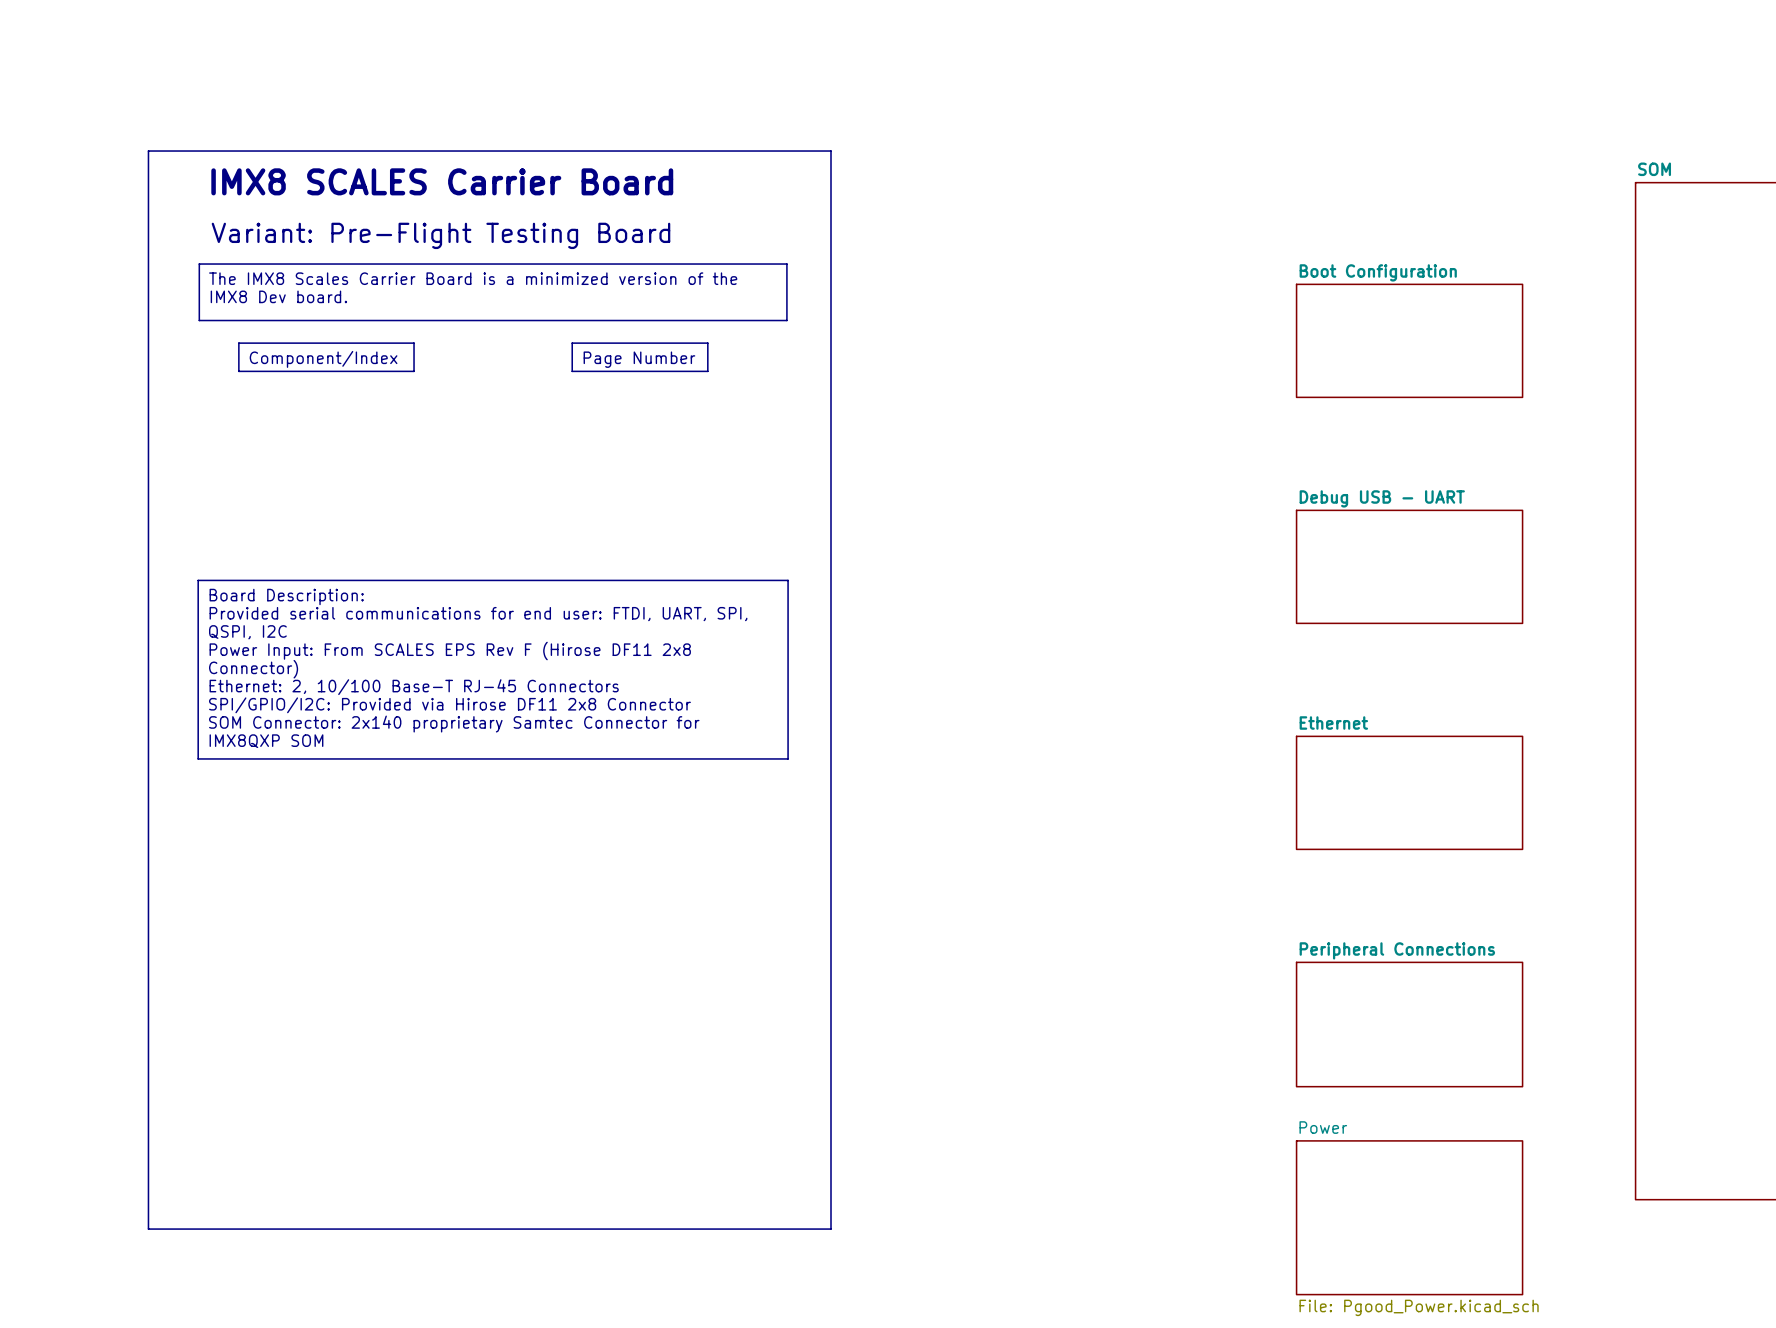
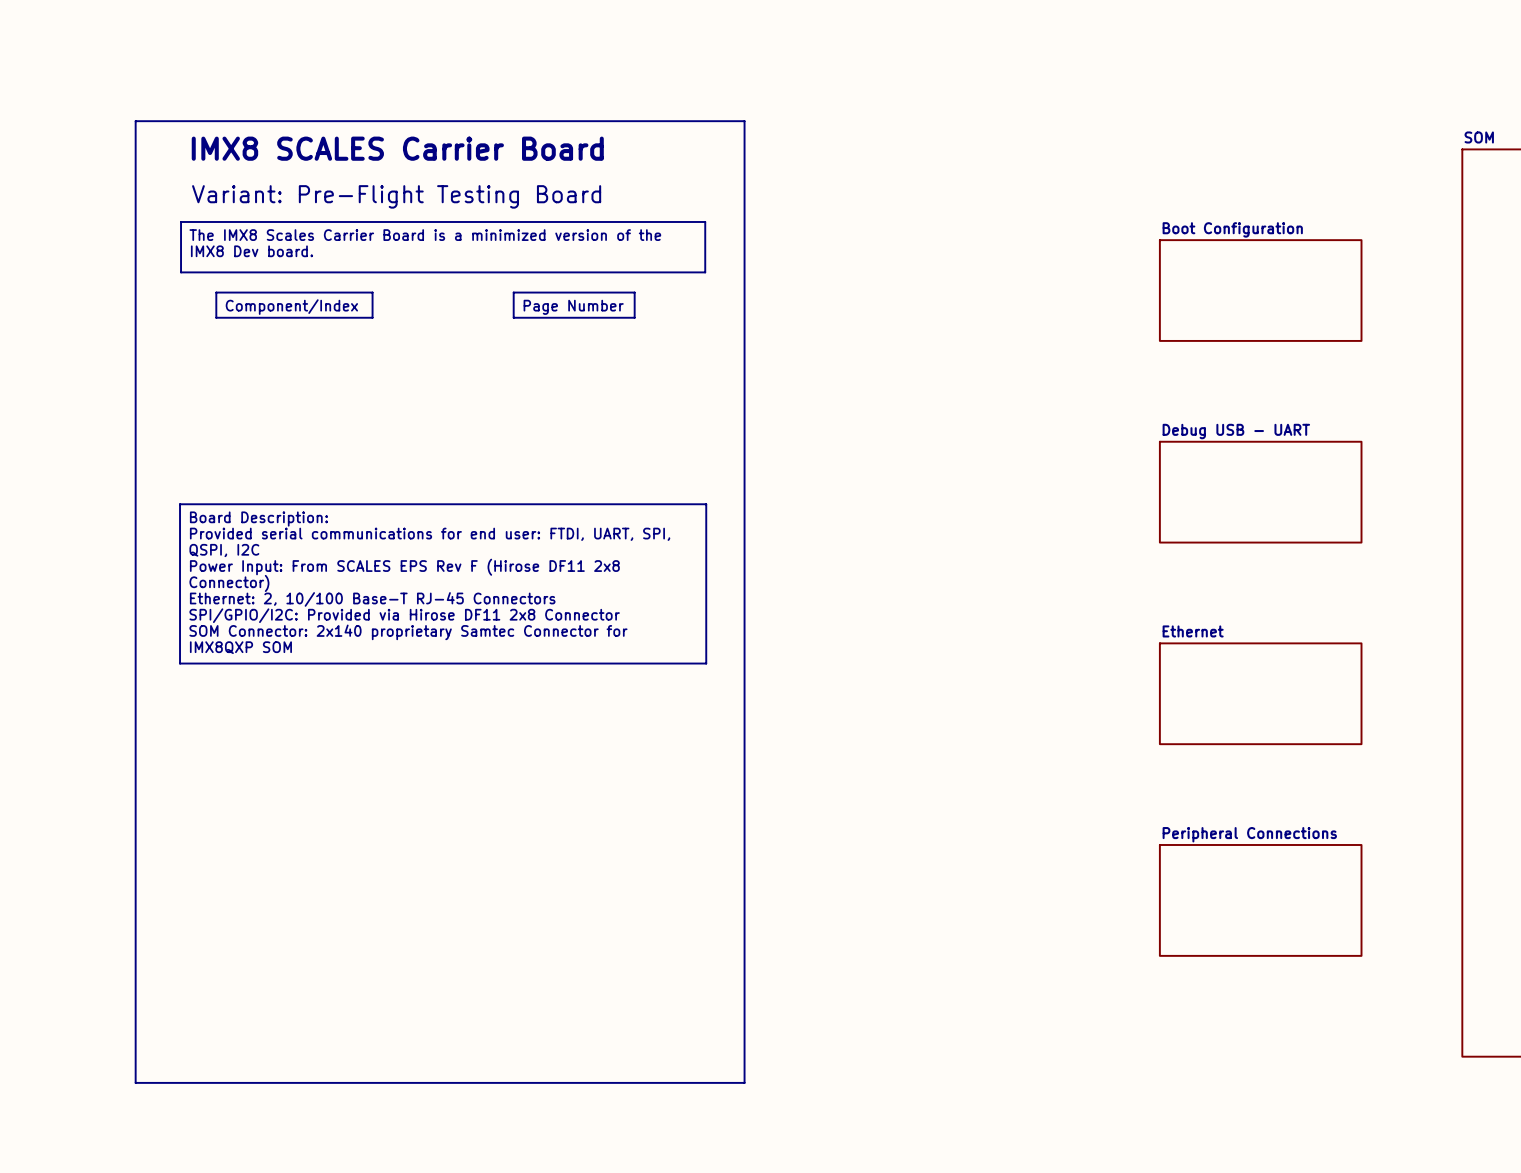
sheet Power: File: Pgood_Power.kicad_sch (1409, 1217) -> none

